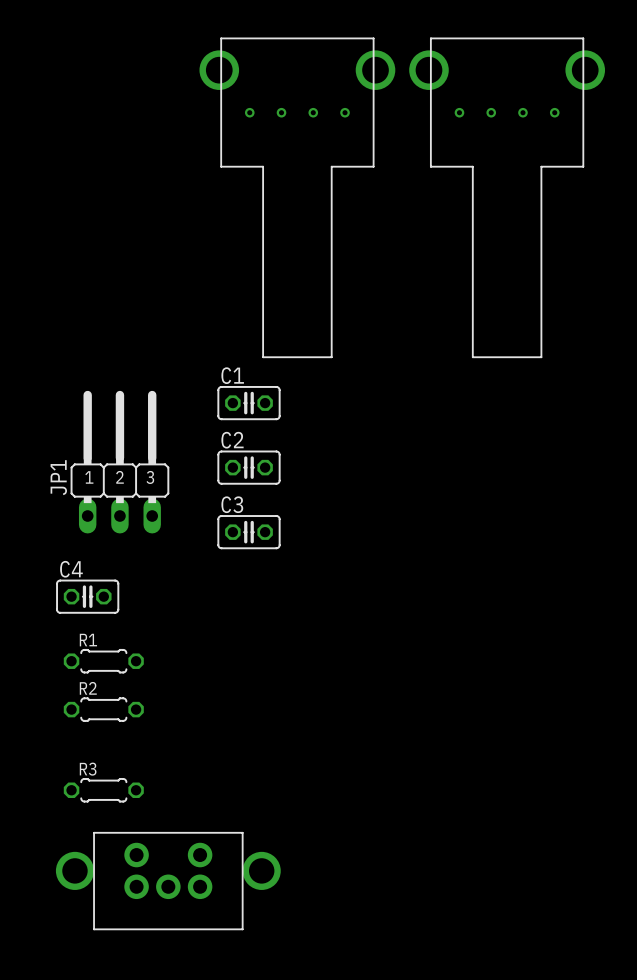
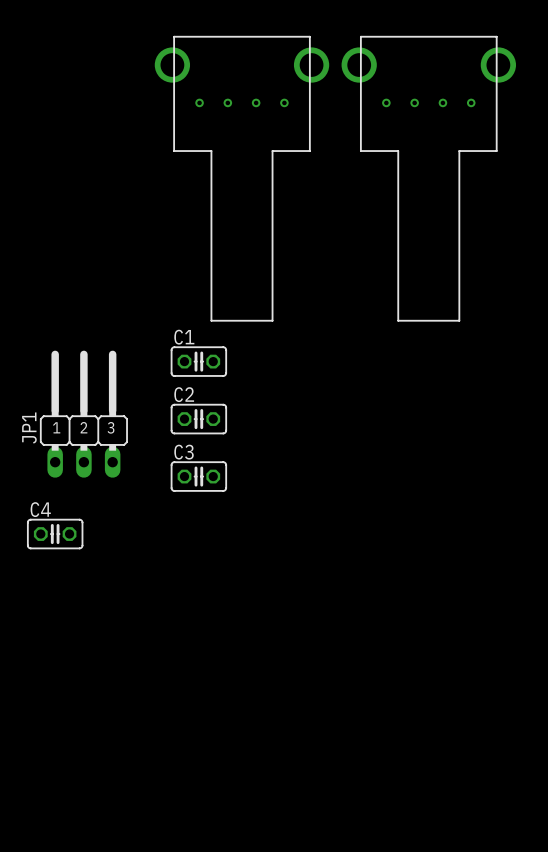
R1: (103, 661) -> none
R2: (103, 709) -> none
R3: (103, 790) -> none
part: (168, 881) -> none

